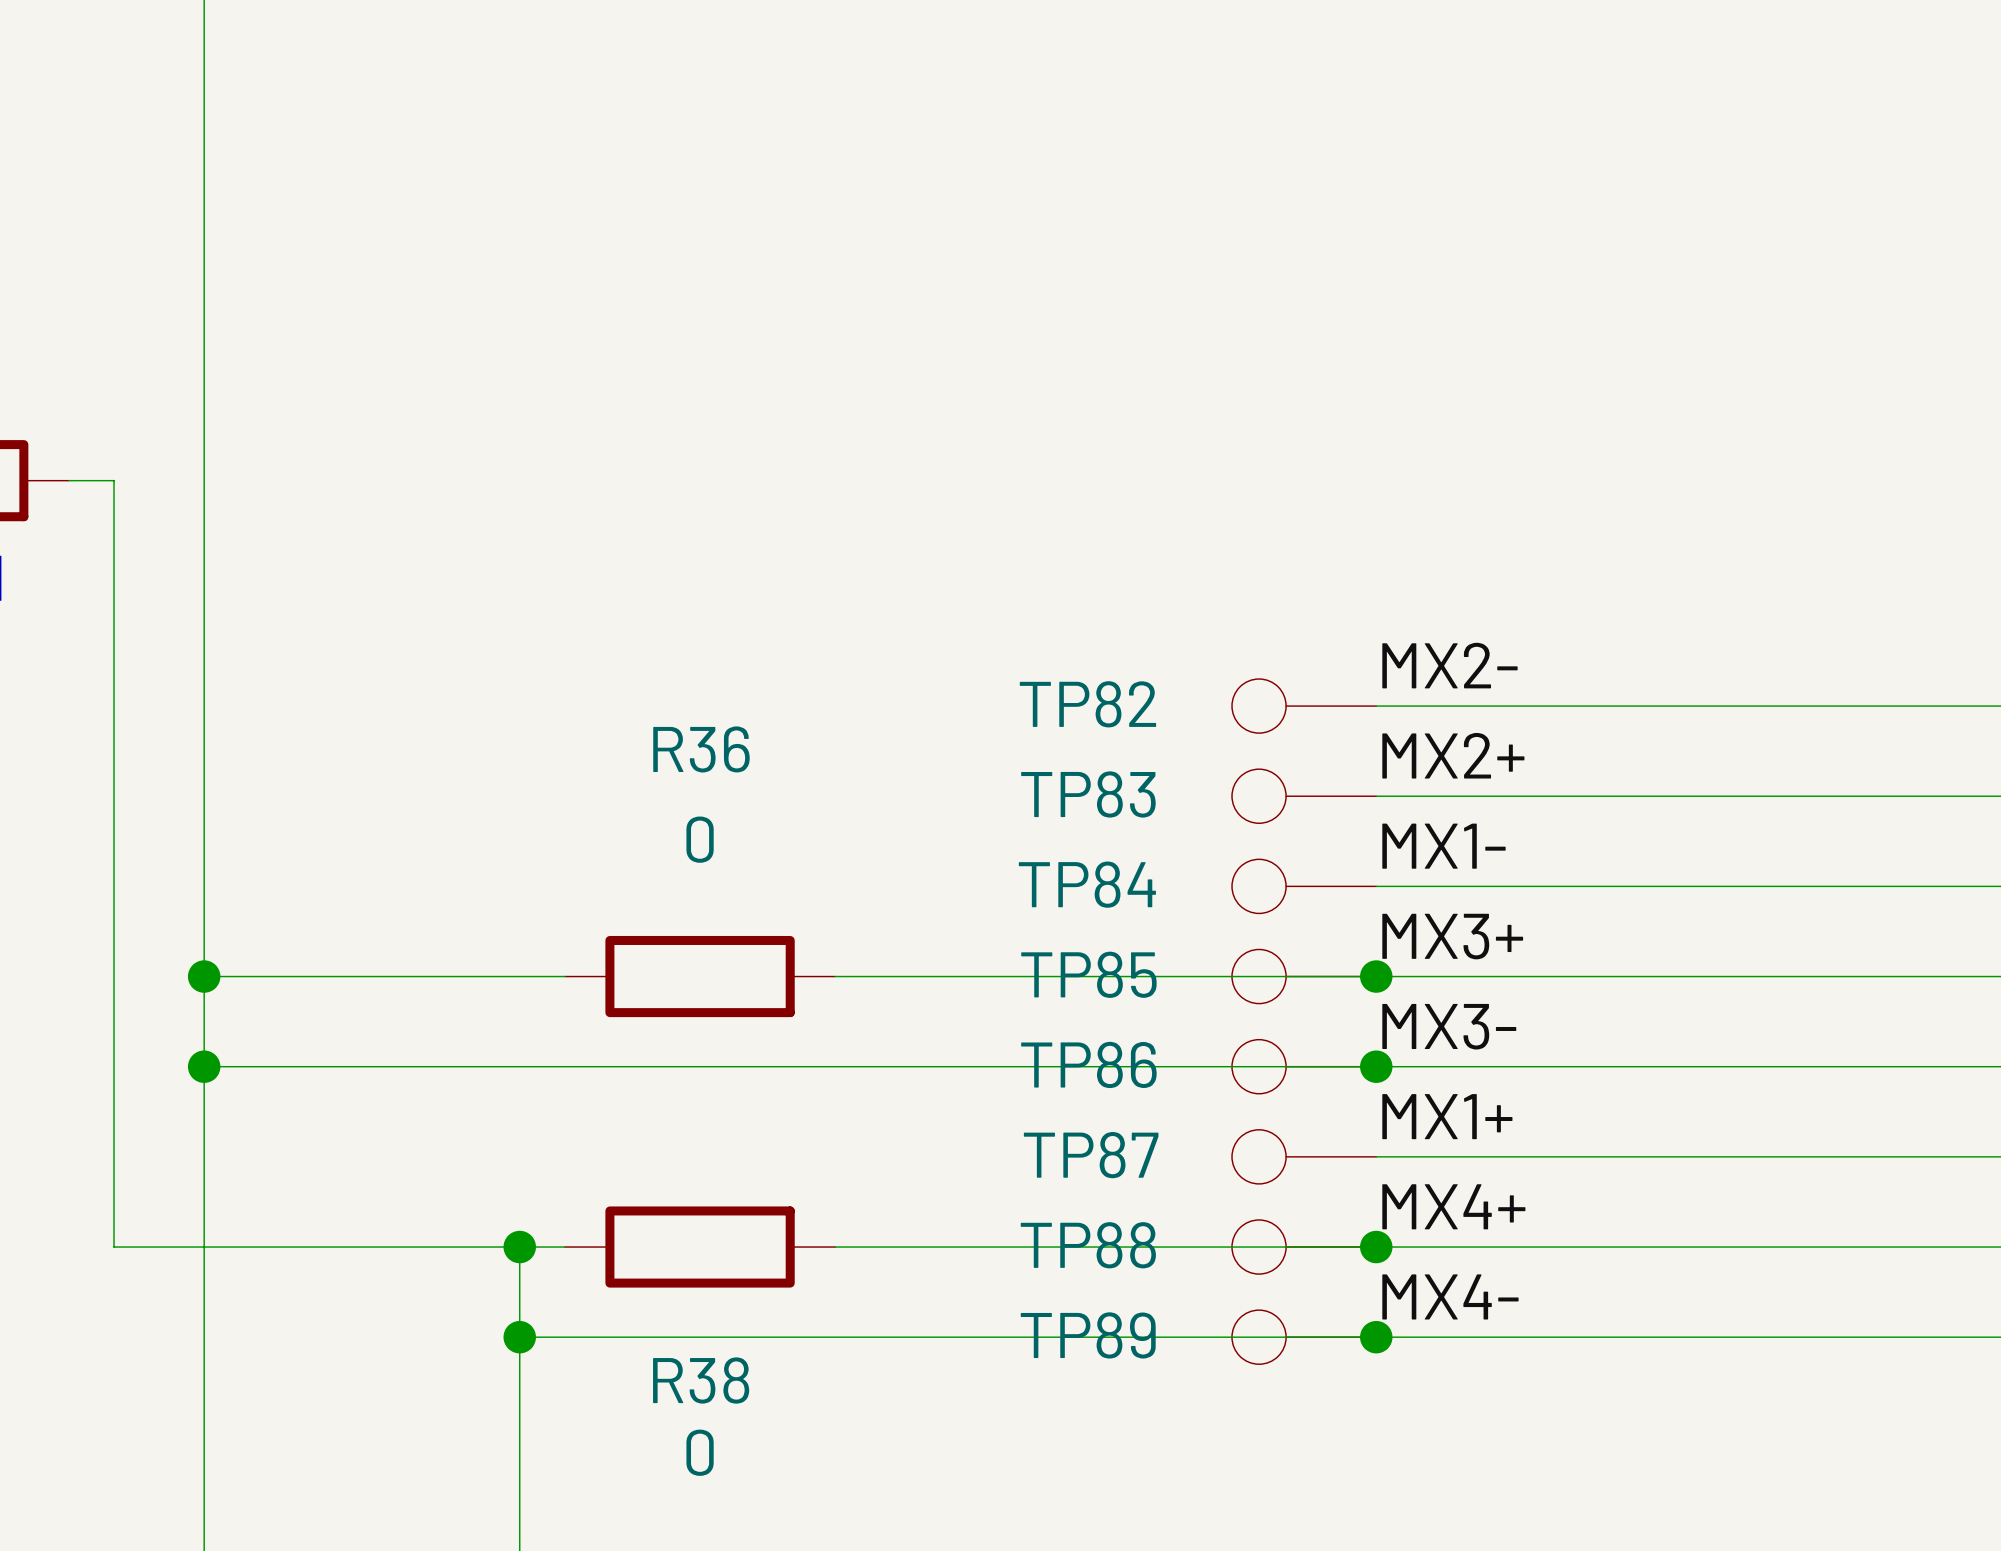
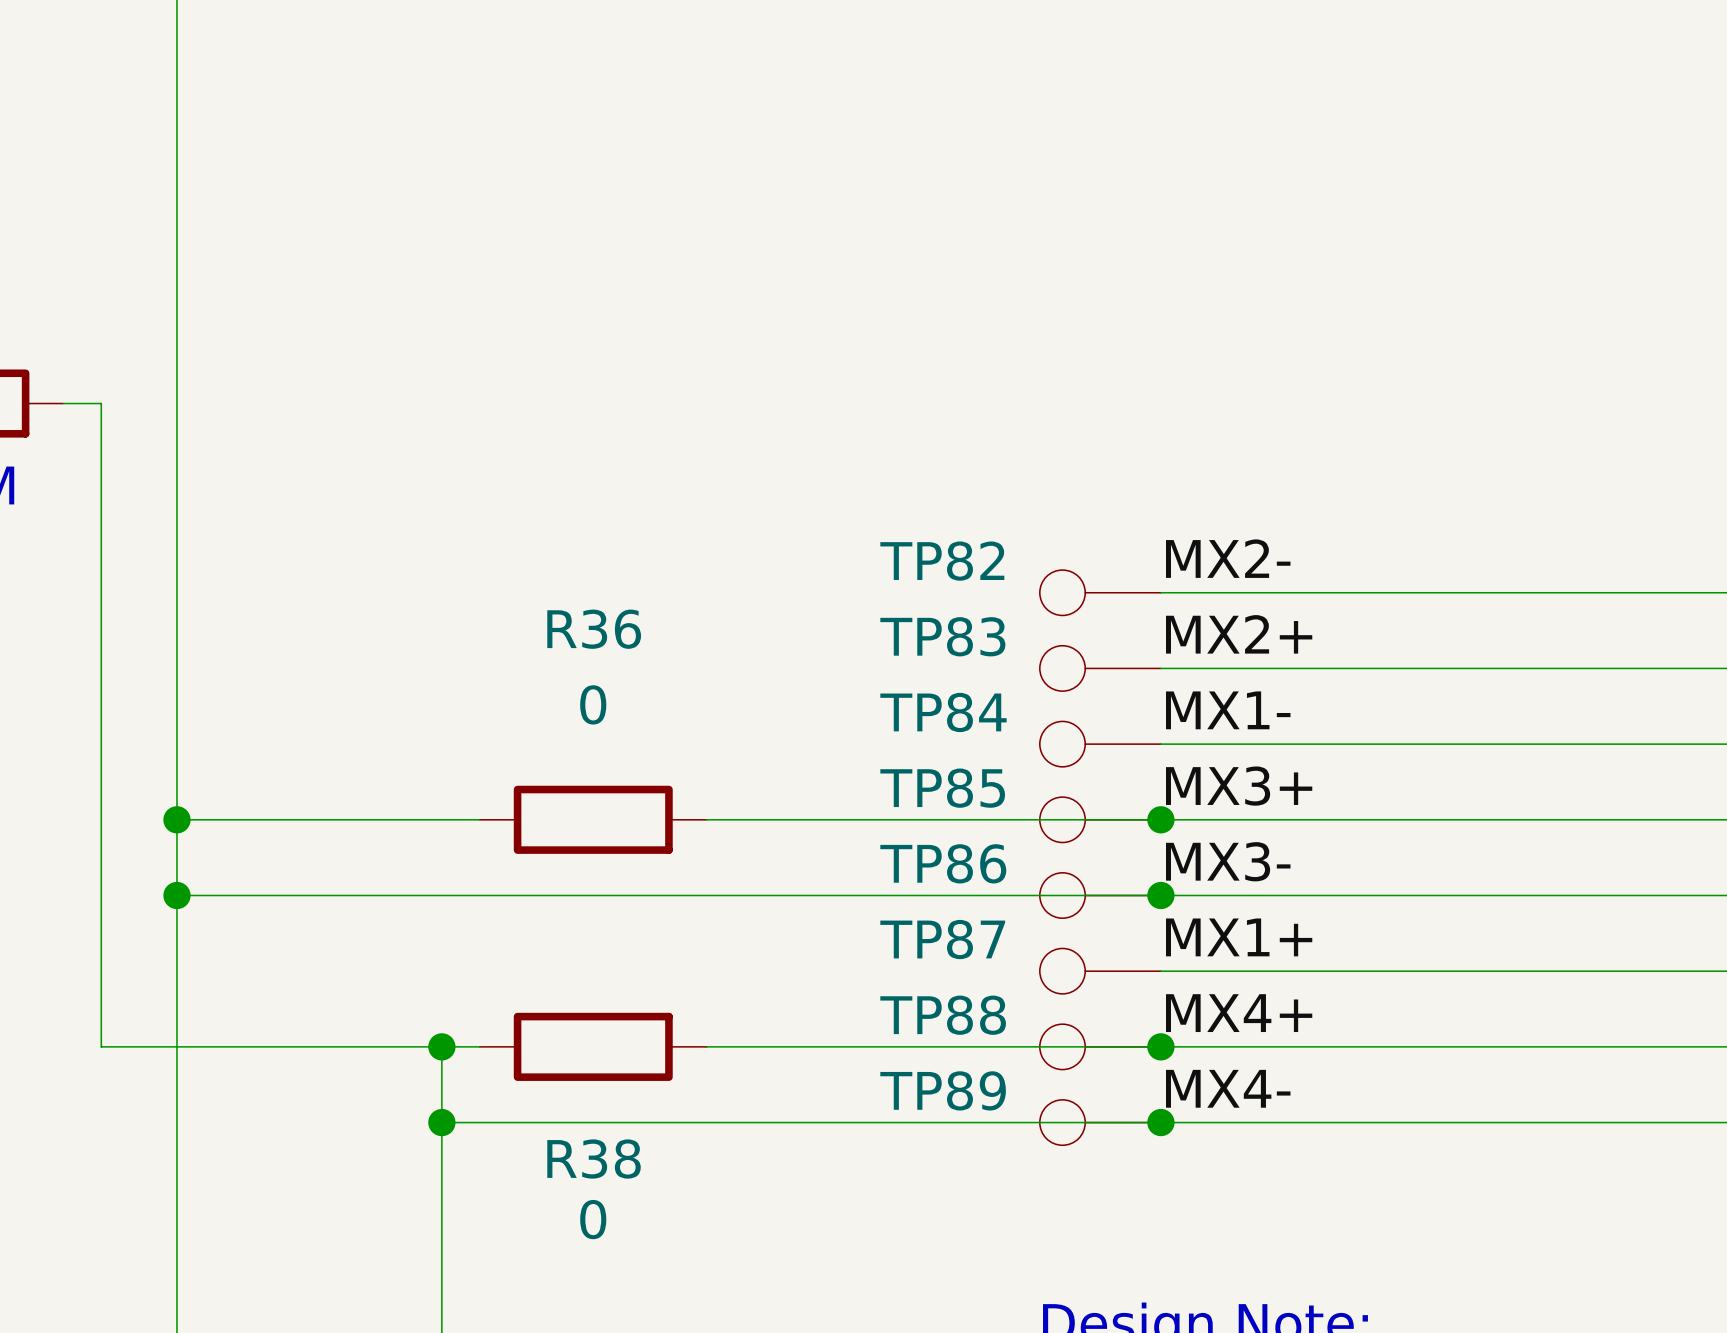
TP82 name position: TP82 (1087, 704) -> TP82 (942, 561)
TP83 name position: TP83 (1088, 794) -> TP83 (942, 636)
TP84 name position: TP84 (1087, 884) -> TP84 (943, 712)
TP85 name position: TP85 (1088, 974) -> TP85 (942, 788)
TP86 name position: TP86 (1088, 1064) -> TP86 (943, 863)
TP87 name position: TP87 (1091, 1155) -> TP87 (942, 939)
TP88 name position: TP88 (1088, 1245) -> TP88 (943, 1015)
TP89 name position: TP89 (1088, 1335) -> TP89 (943, 1090)

